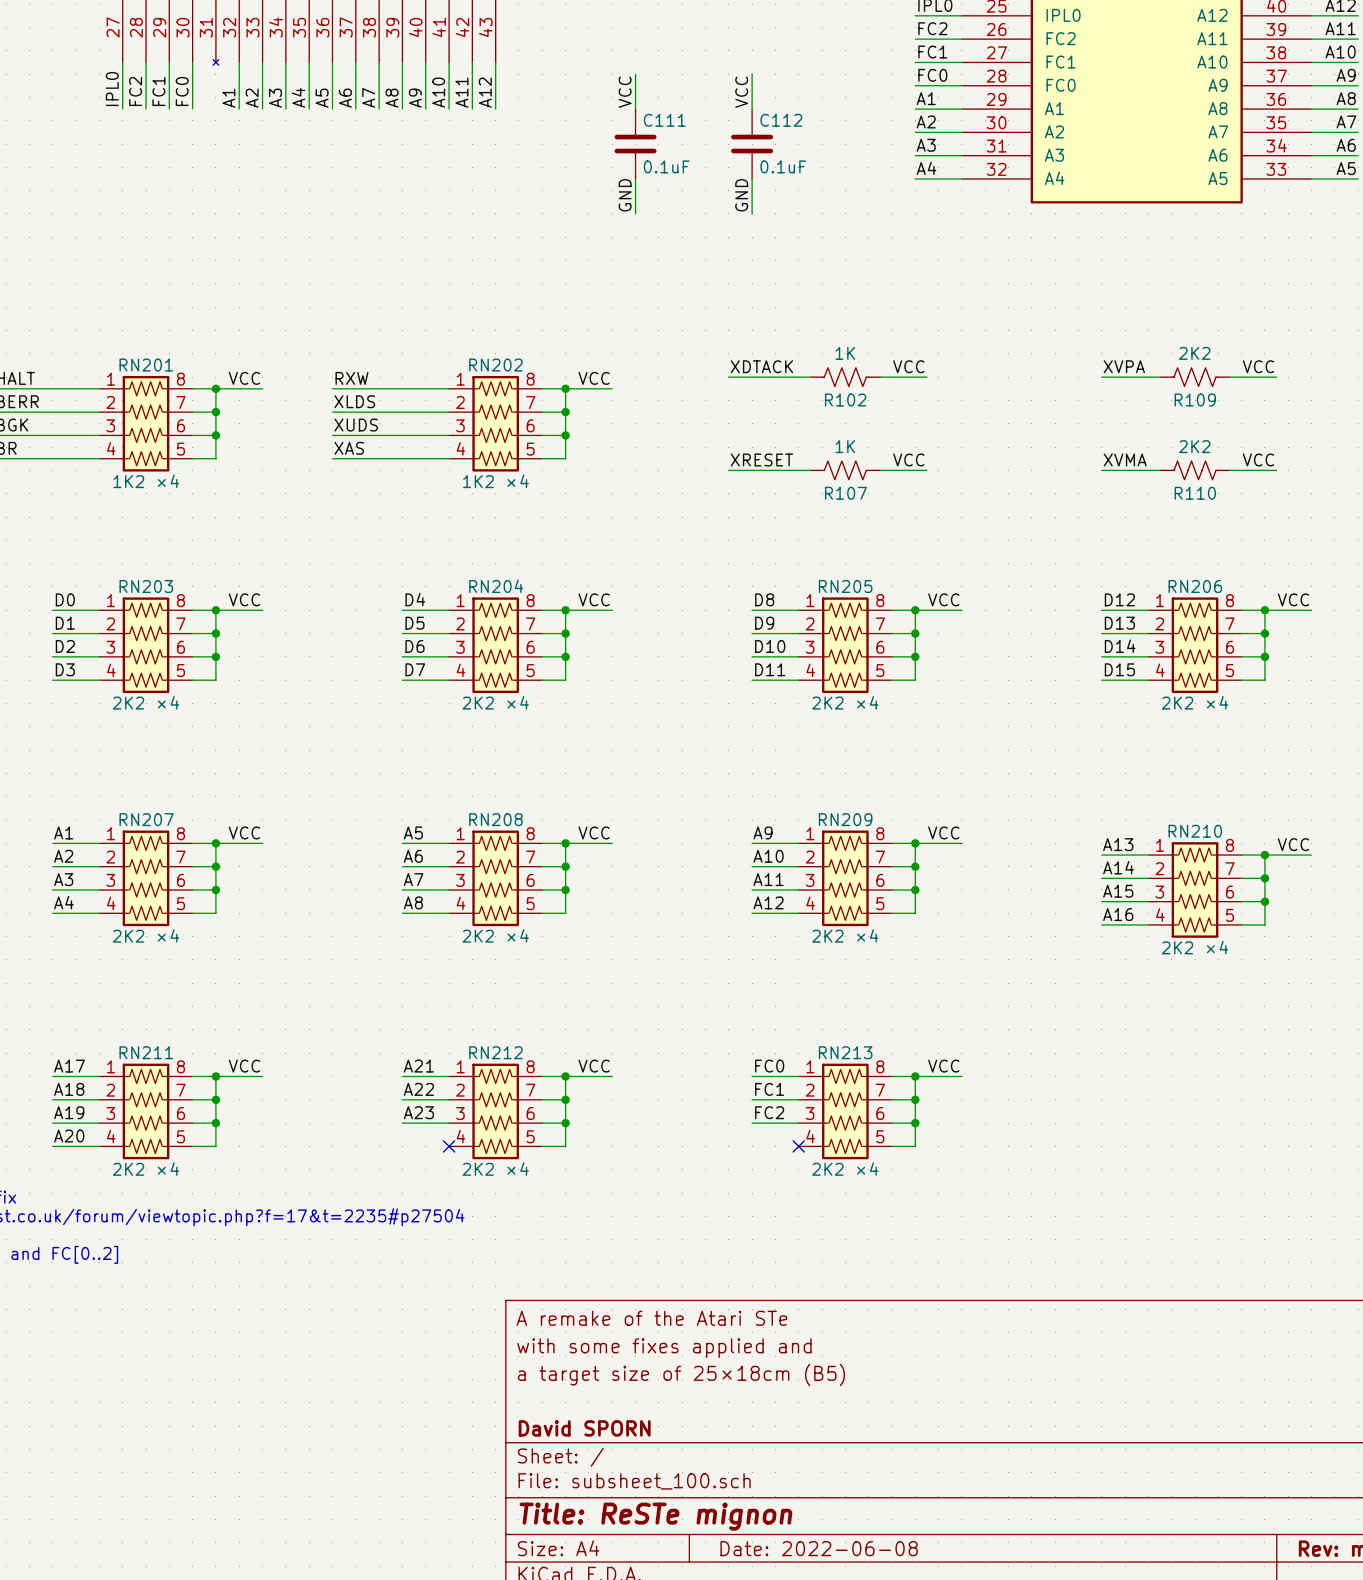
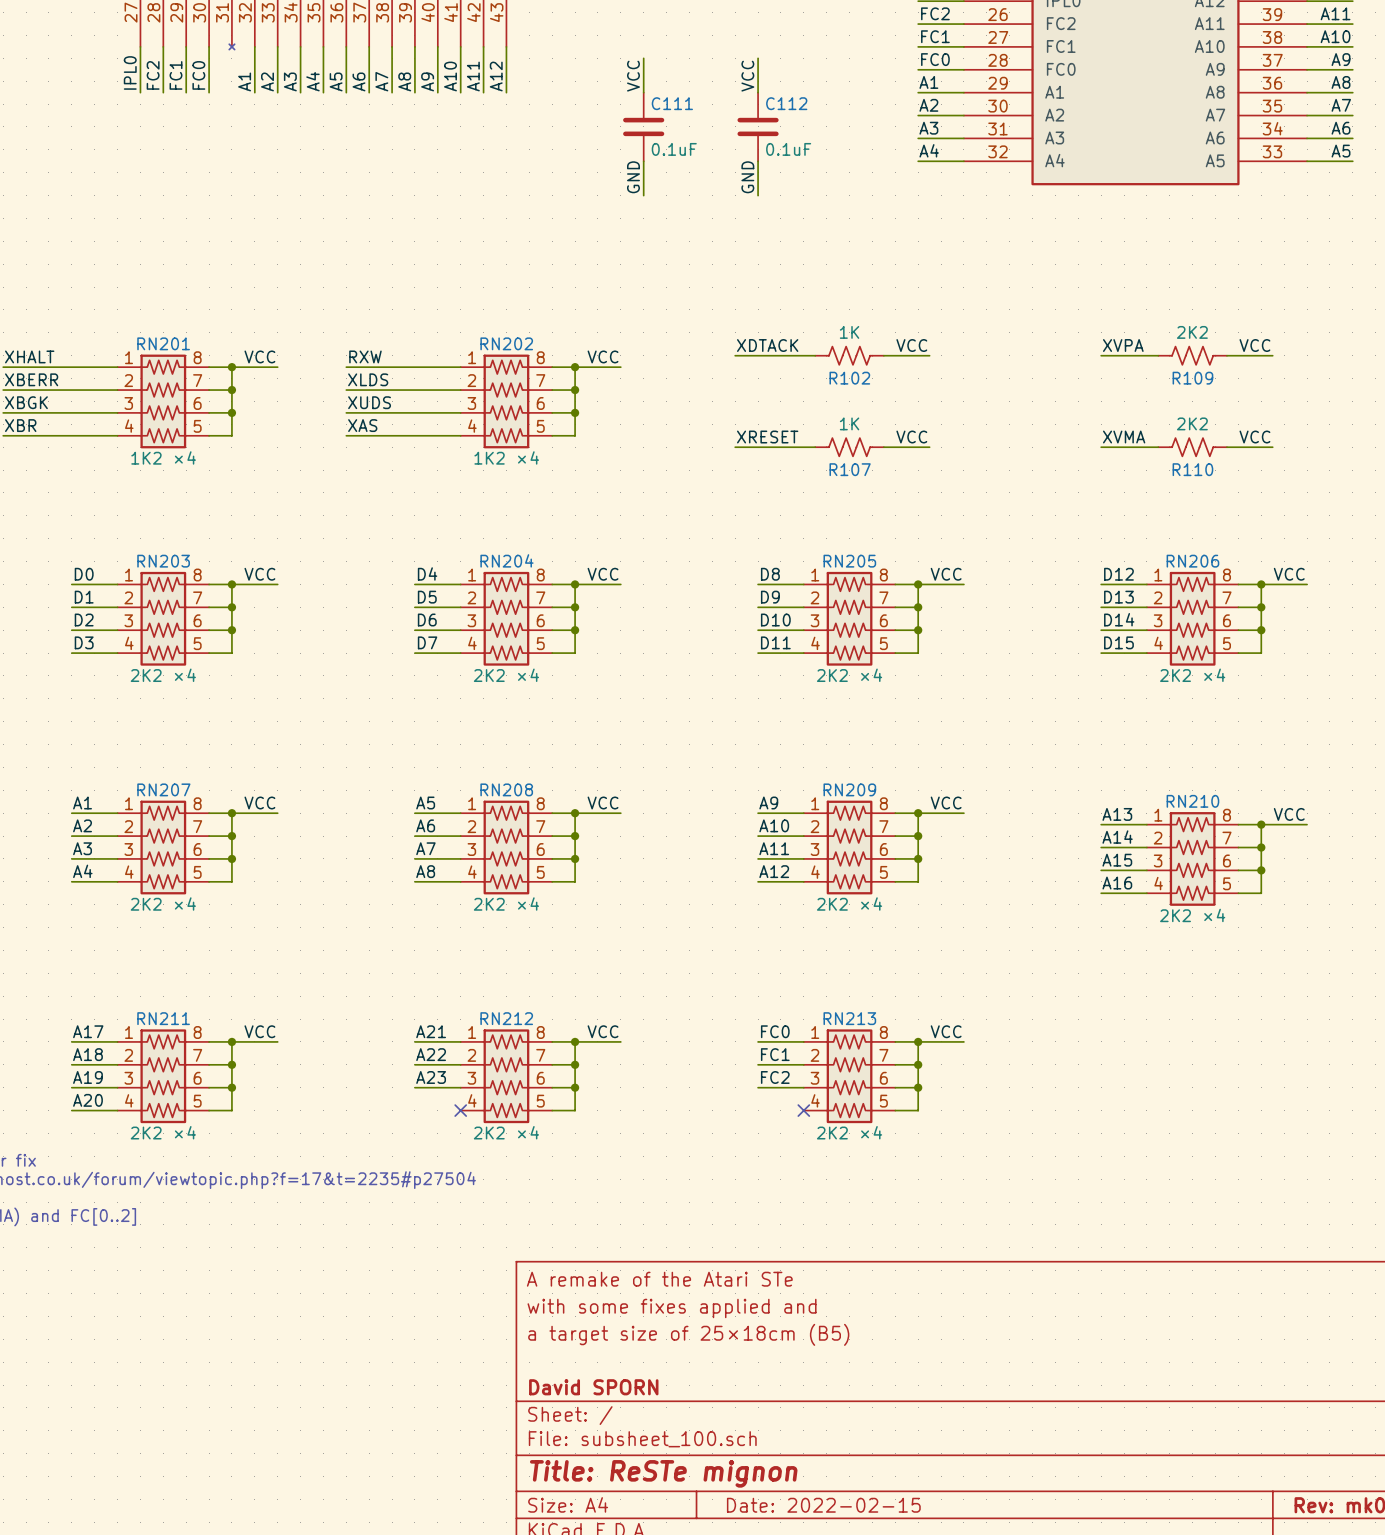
title block: Date: 2022-06-08 (819, 1548) -> Date: 2022-02-15 (823, 1505)

